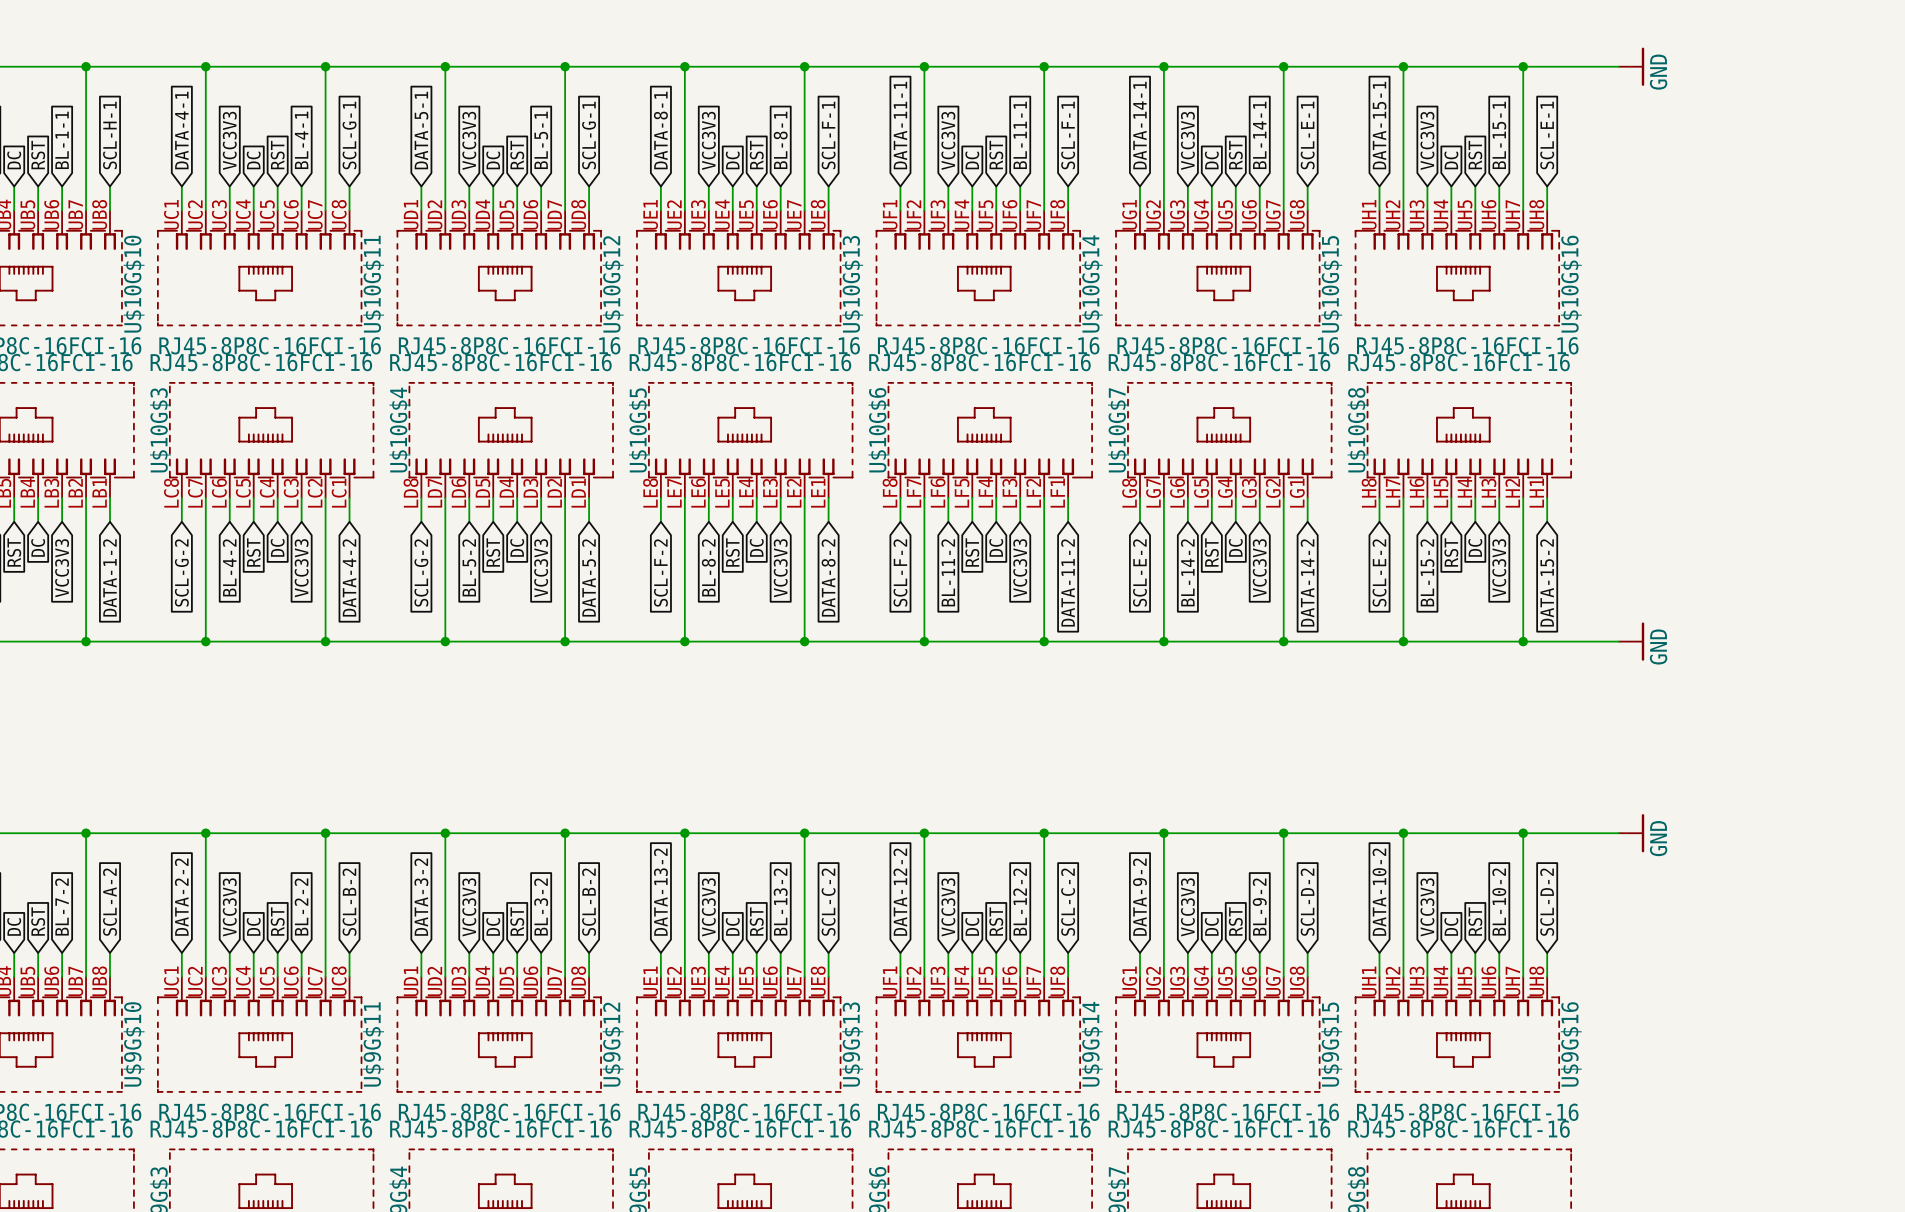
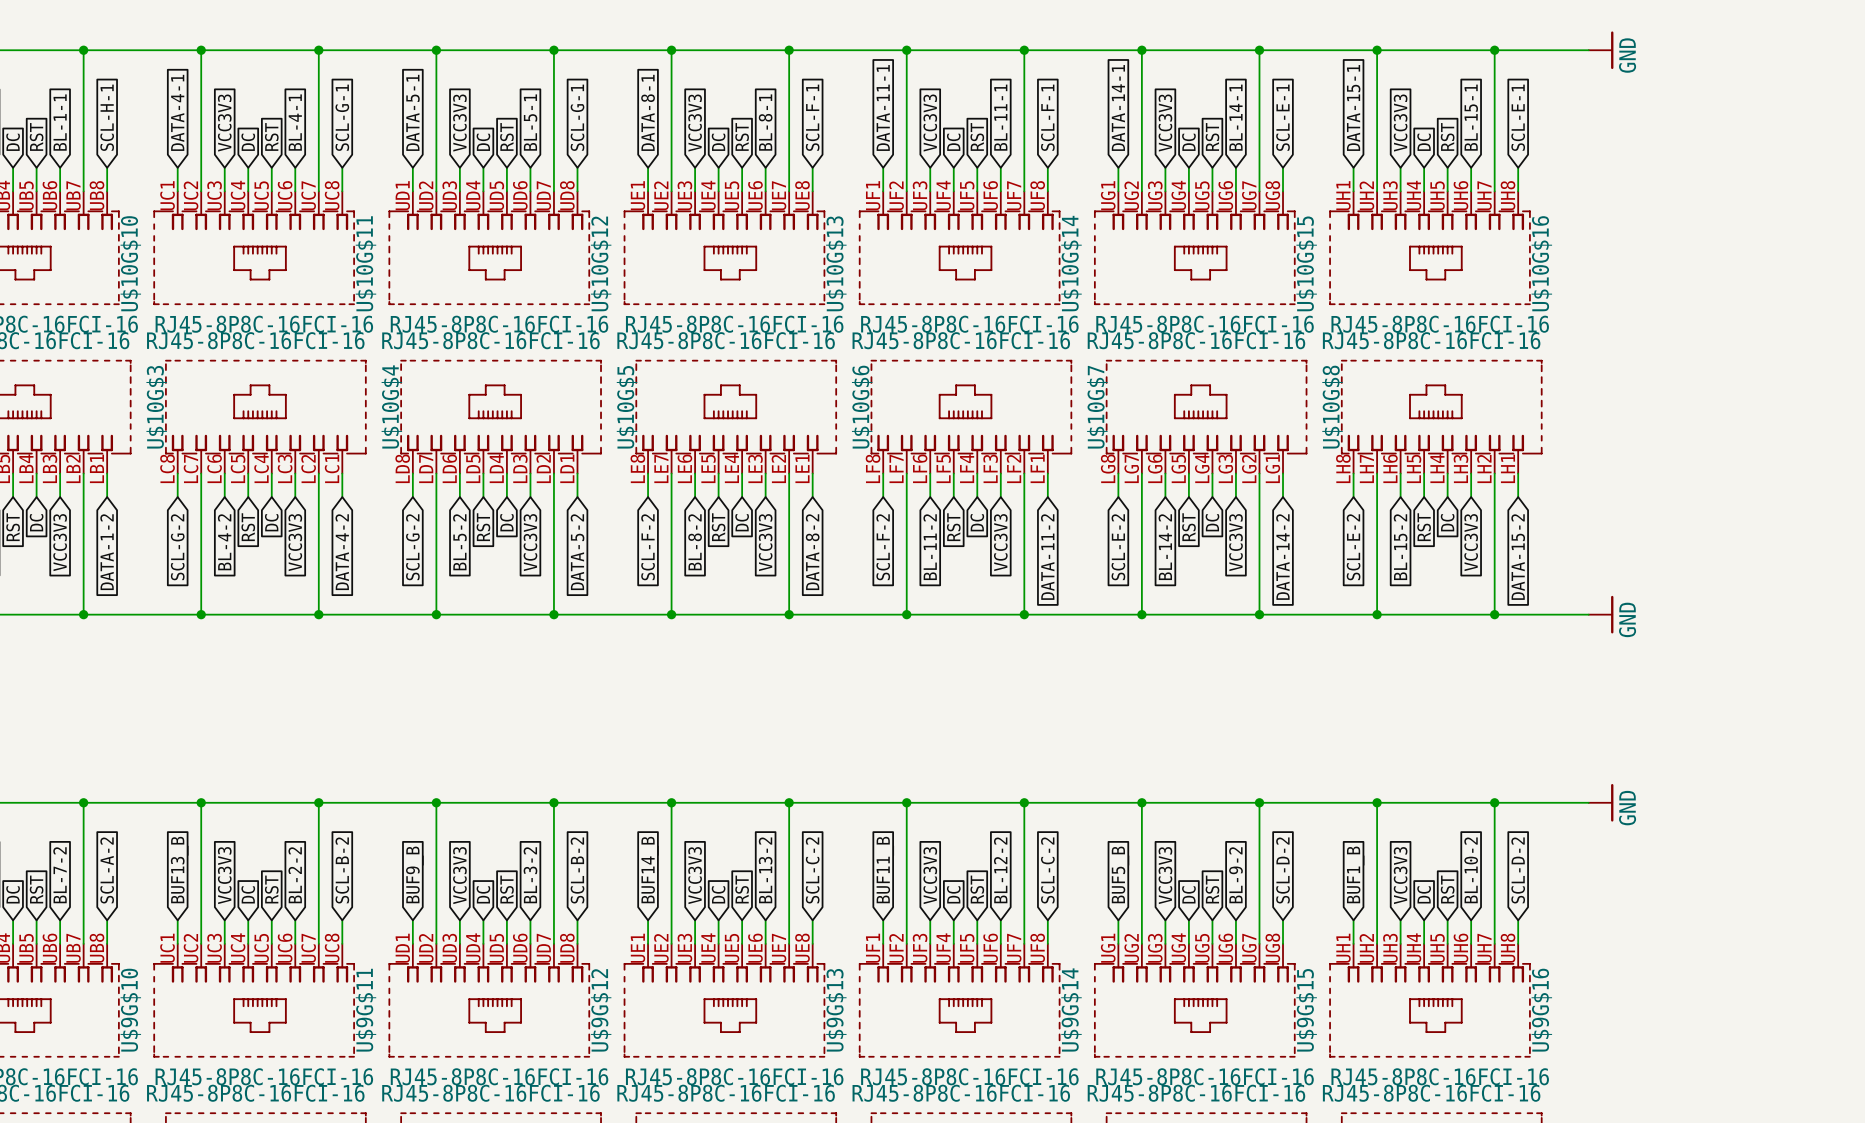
global label: DATA-13-2 (660, 892) -> BUF14_B (650, 870)
global label: DATA-12-2 (900, 892) -> BUF11_B (885, 870)
global label: DATA-10-2 (1379, 892) -> BUF1_B (1355, 874)
global label: DATA-2-2 (181, 897) -> BUF13_B (179, 870)
global label: DATA-3-2 (421, 897) -> BUF9_B (414, 874)
global label: DATA-9-2 (1139, 897) -> BUF5_B (1120, 874)

